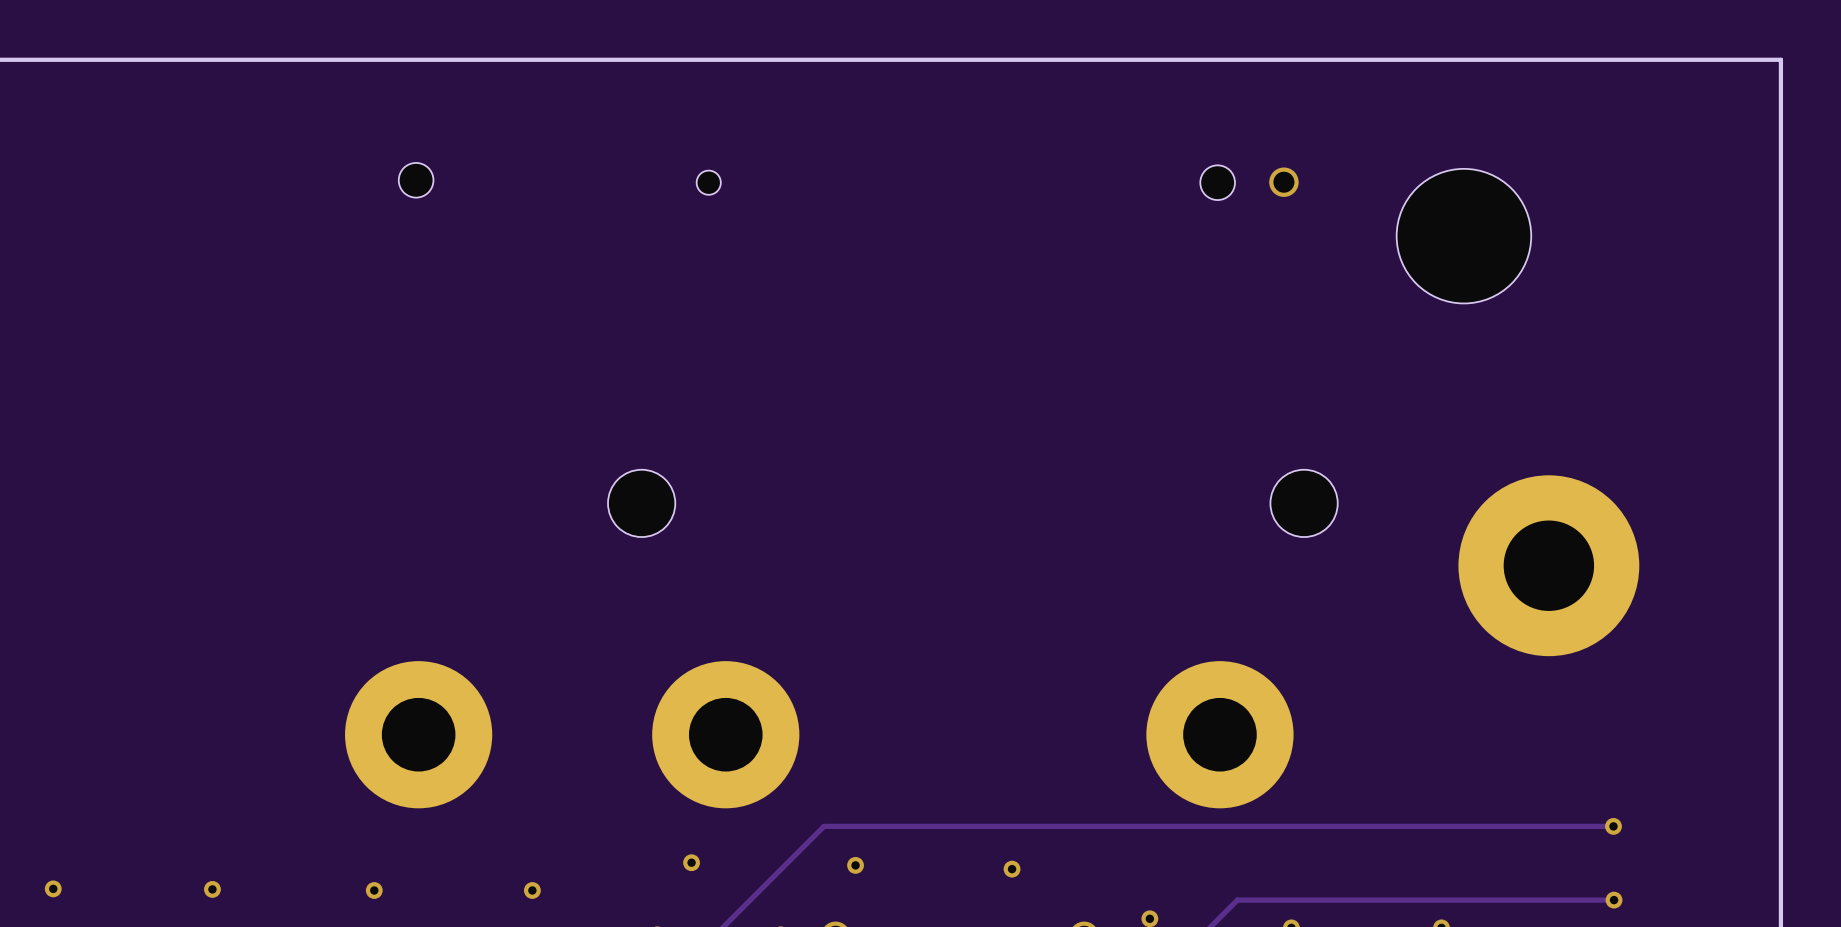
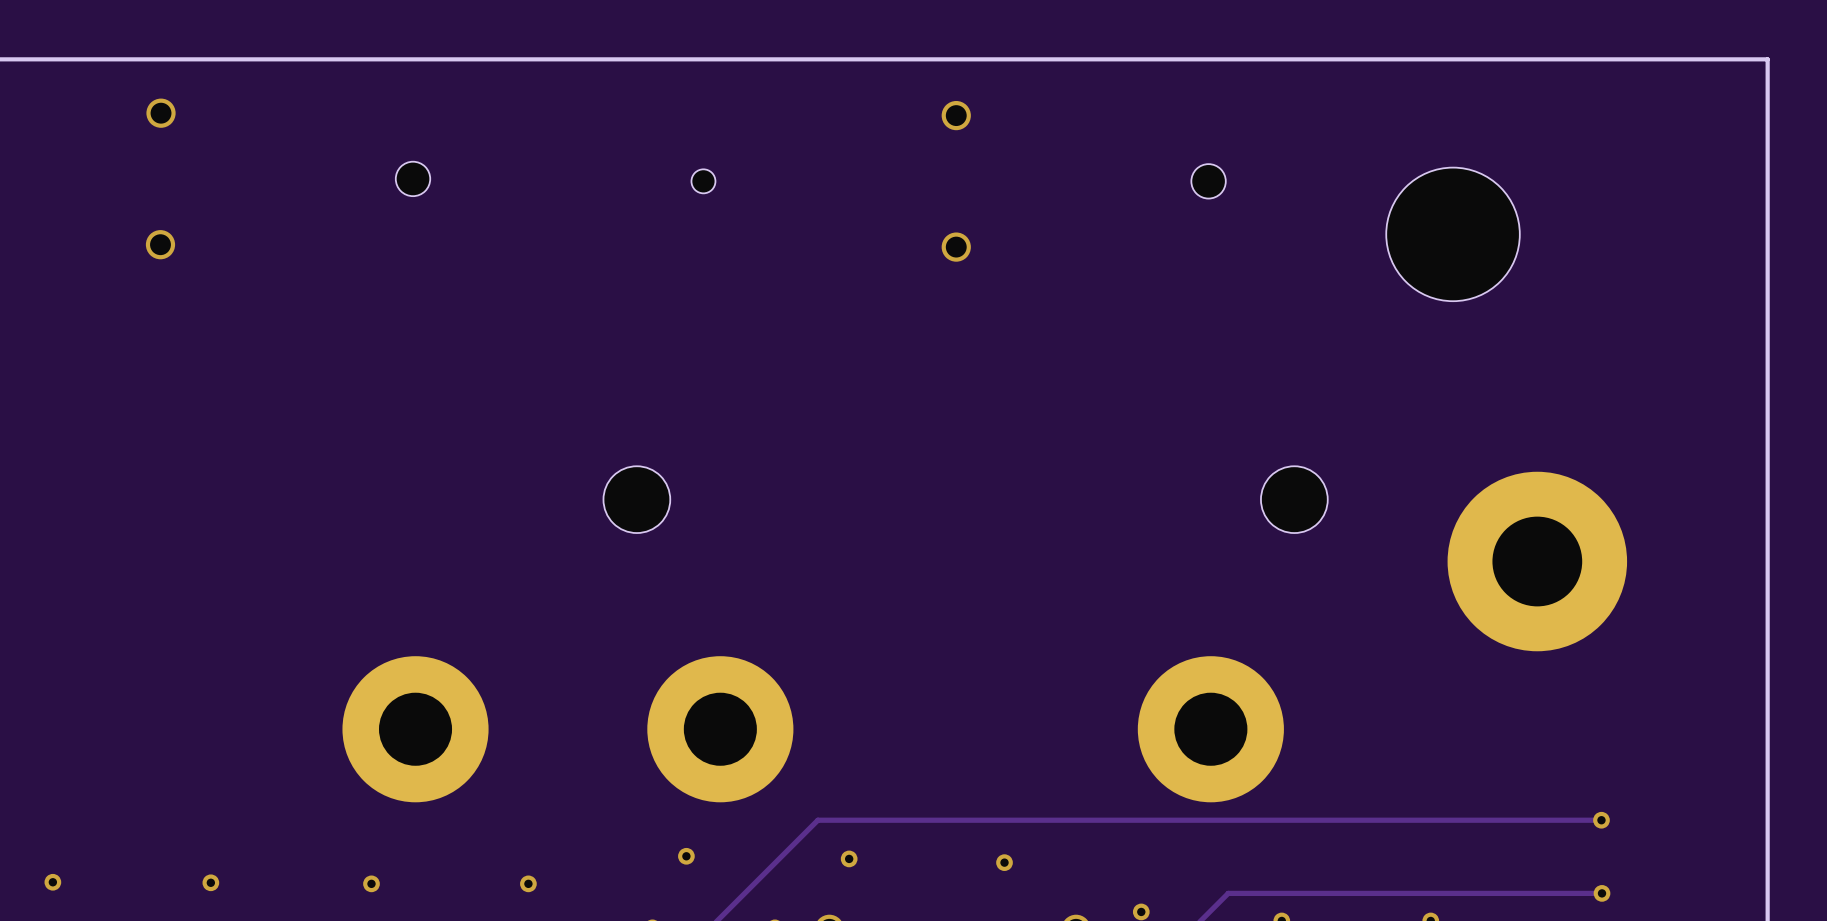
via: none -> (161, 113)
via: none -> (956, 115)
via: (1283, 182) -> none
via: none -> (160, 244)
via: none -> (956, 247)

